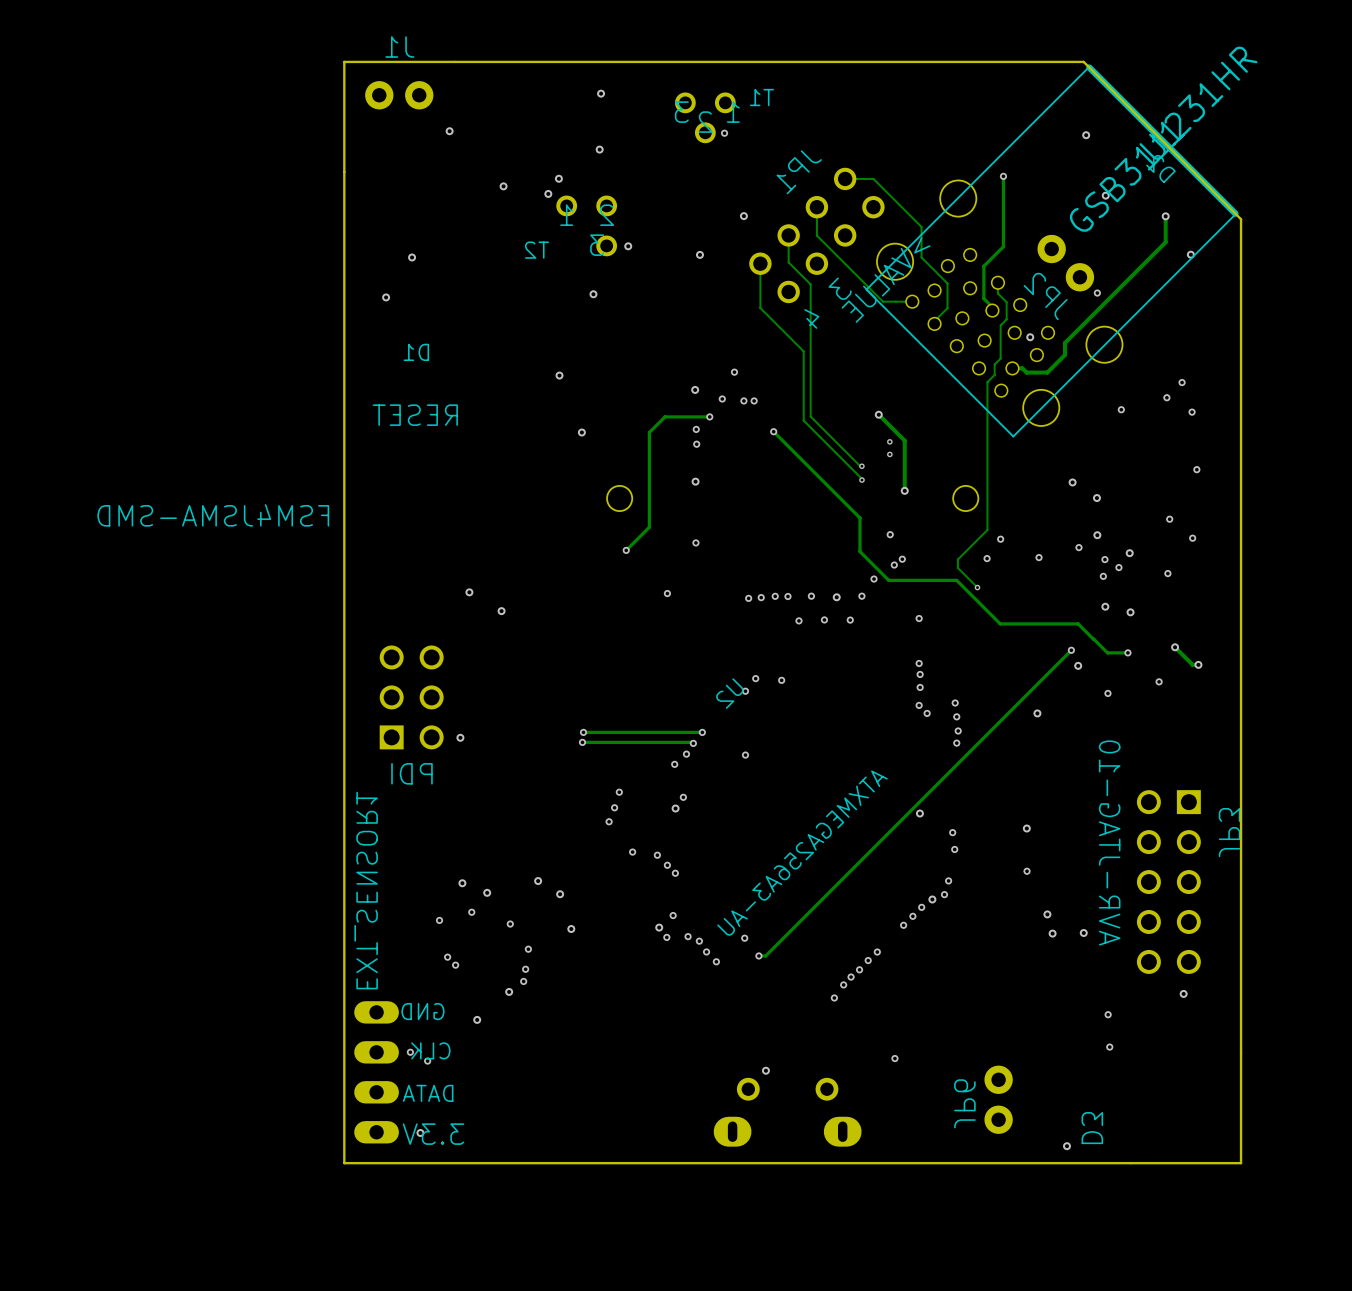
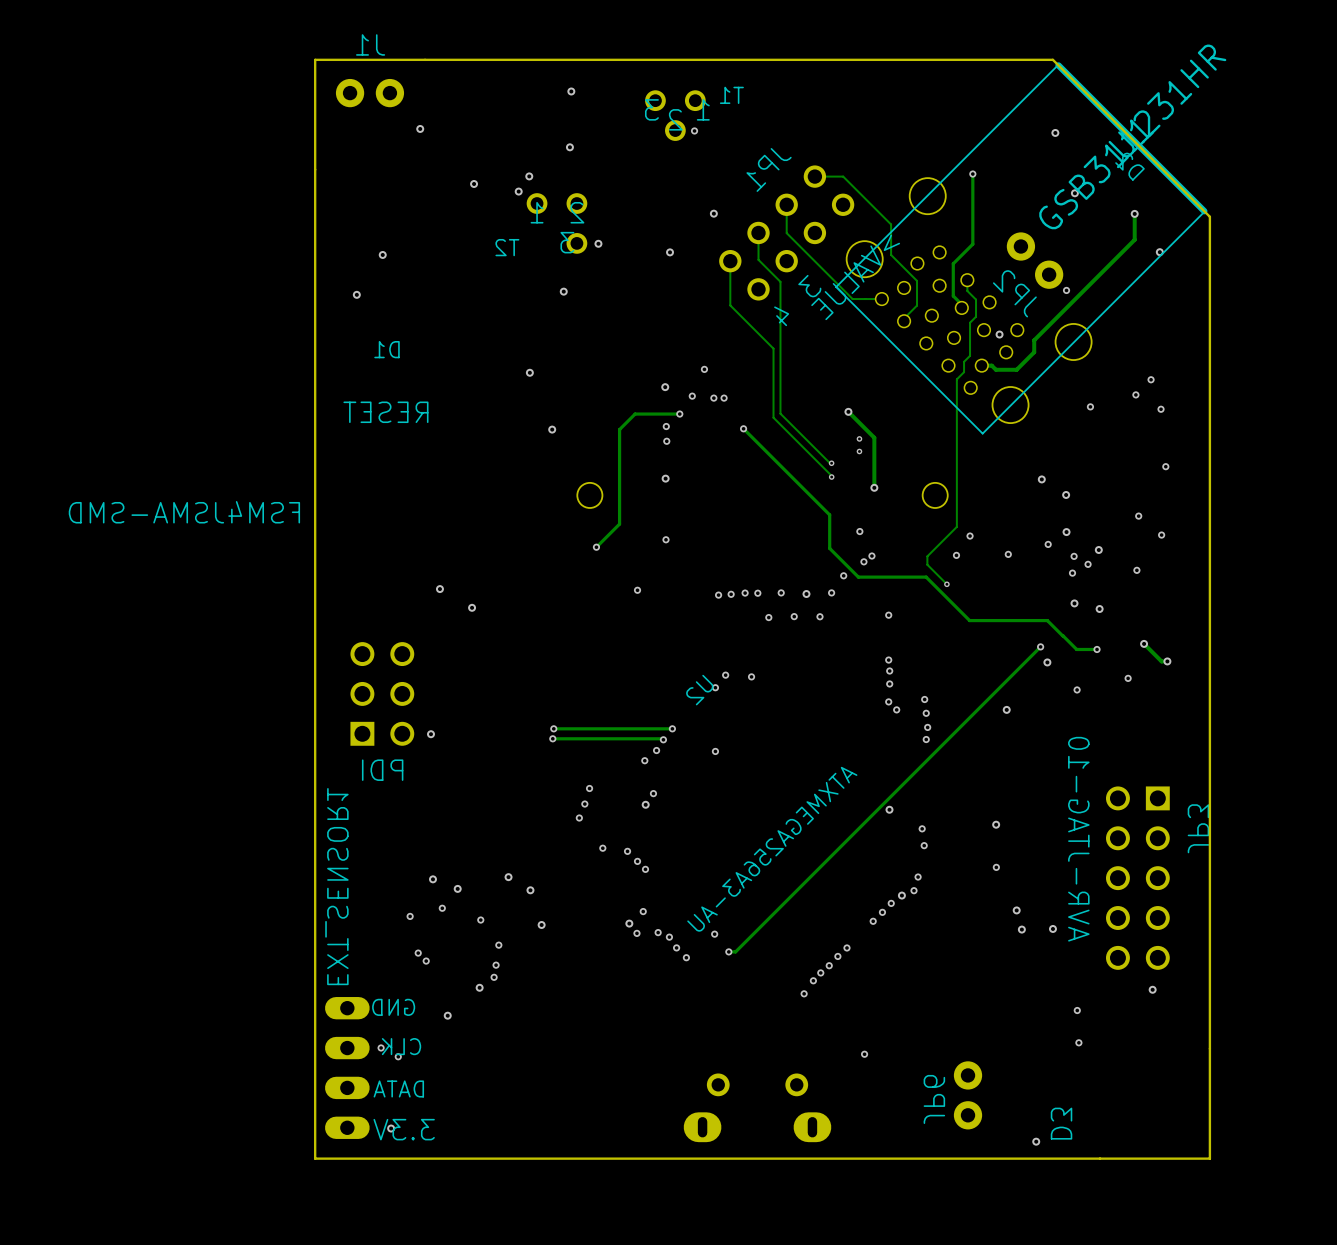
via: (765, 1070) -> none

